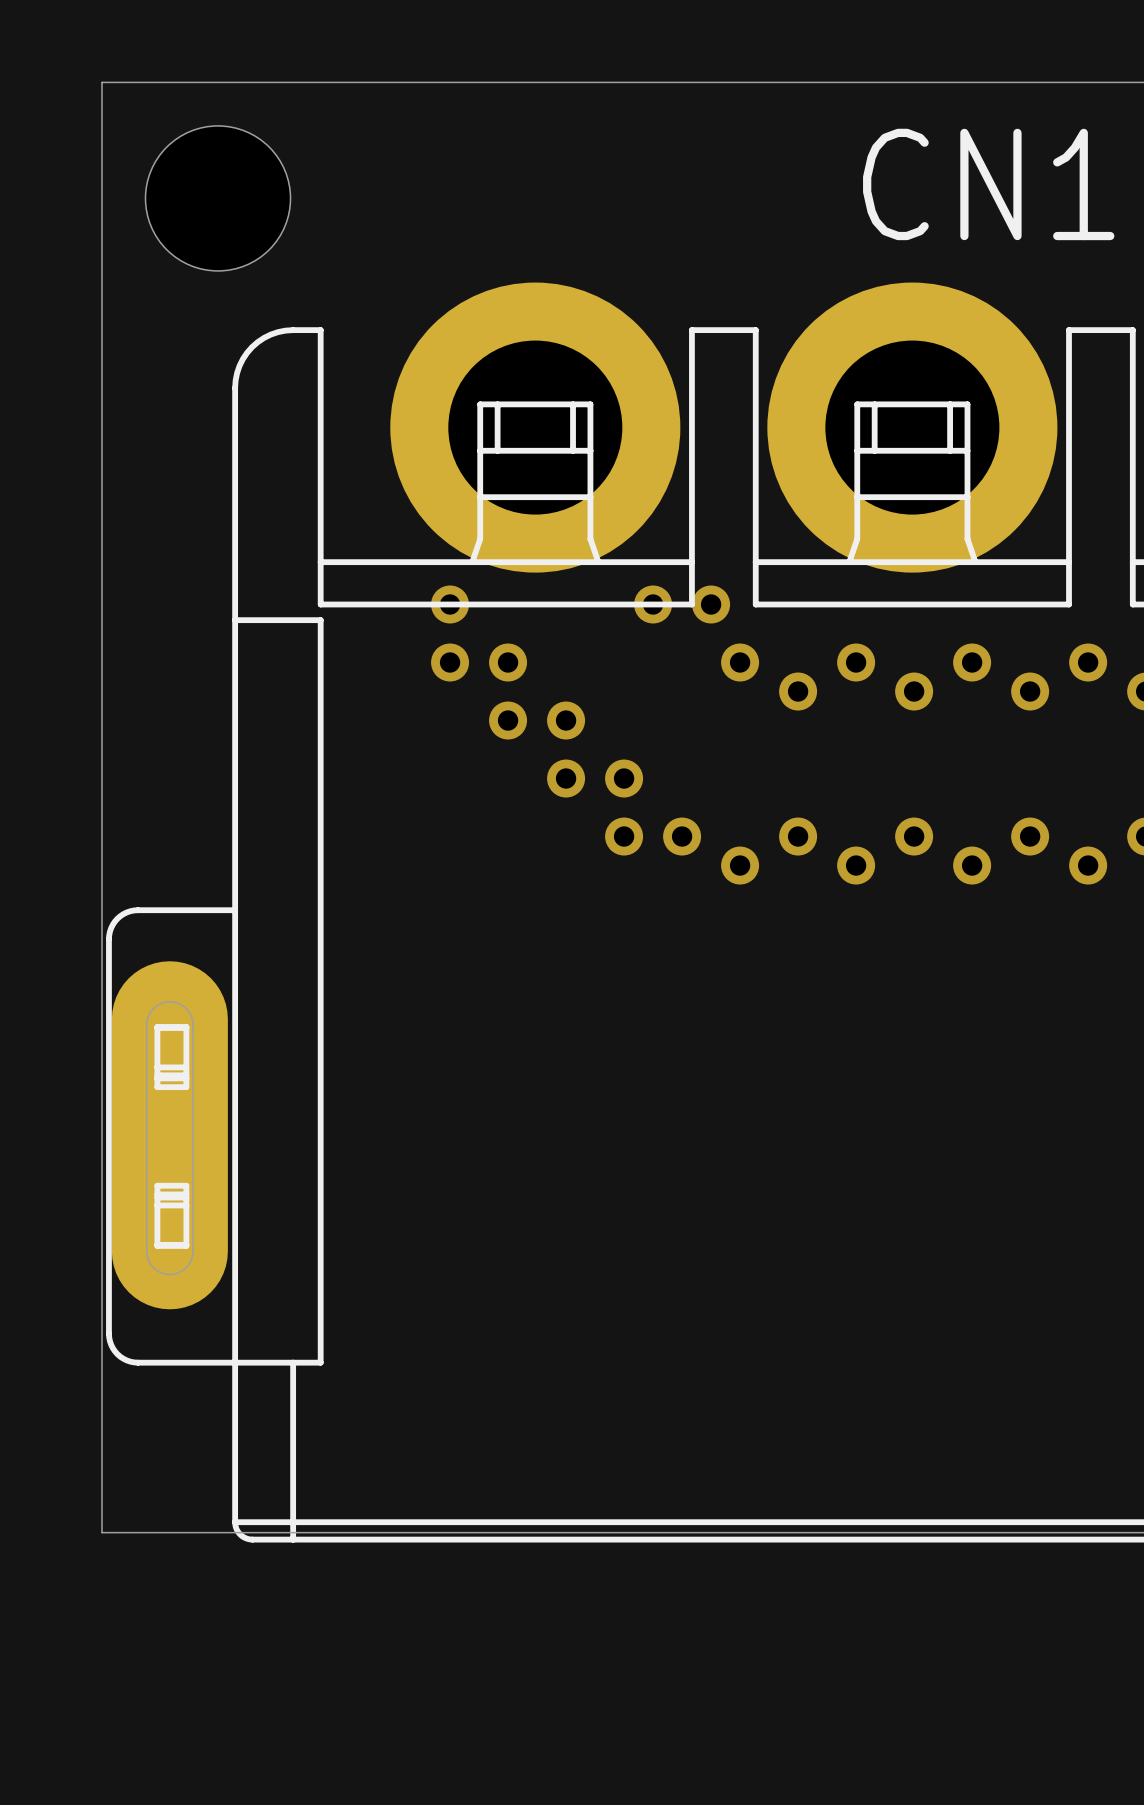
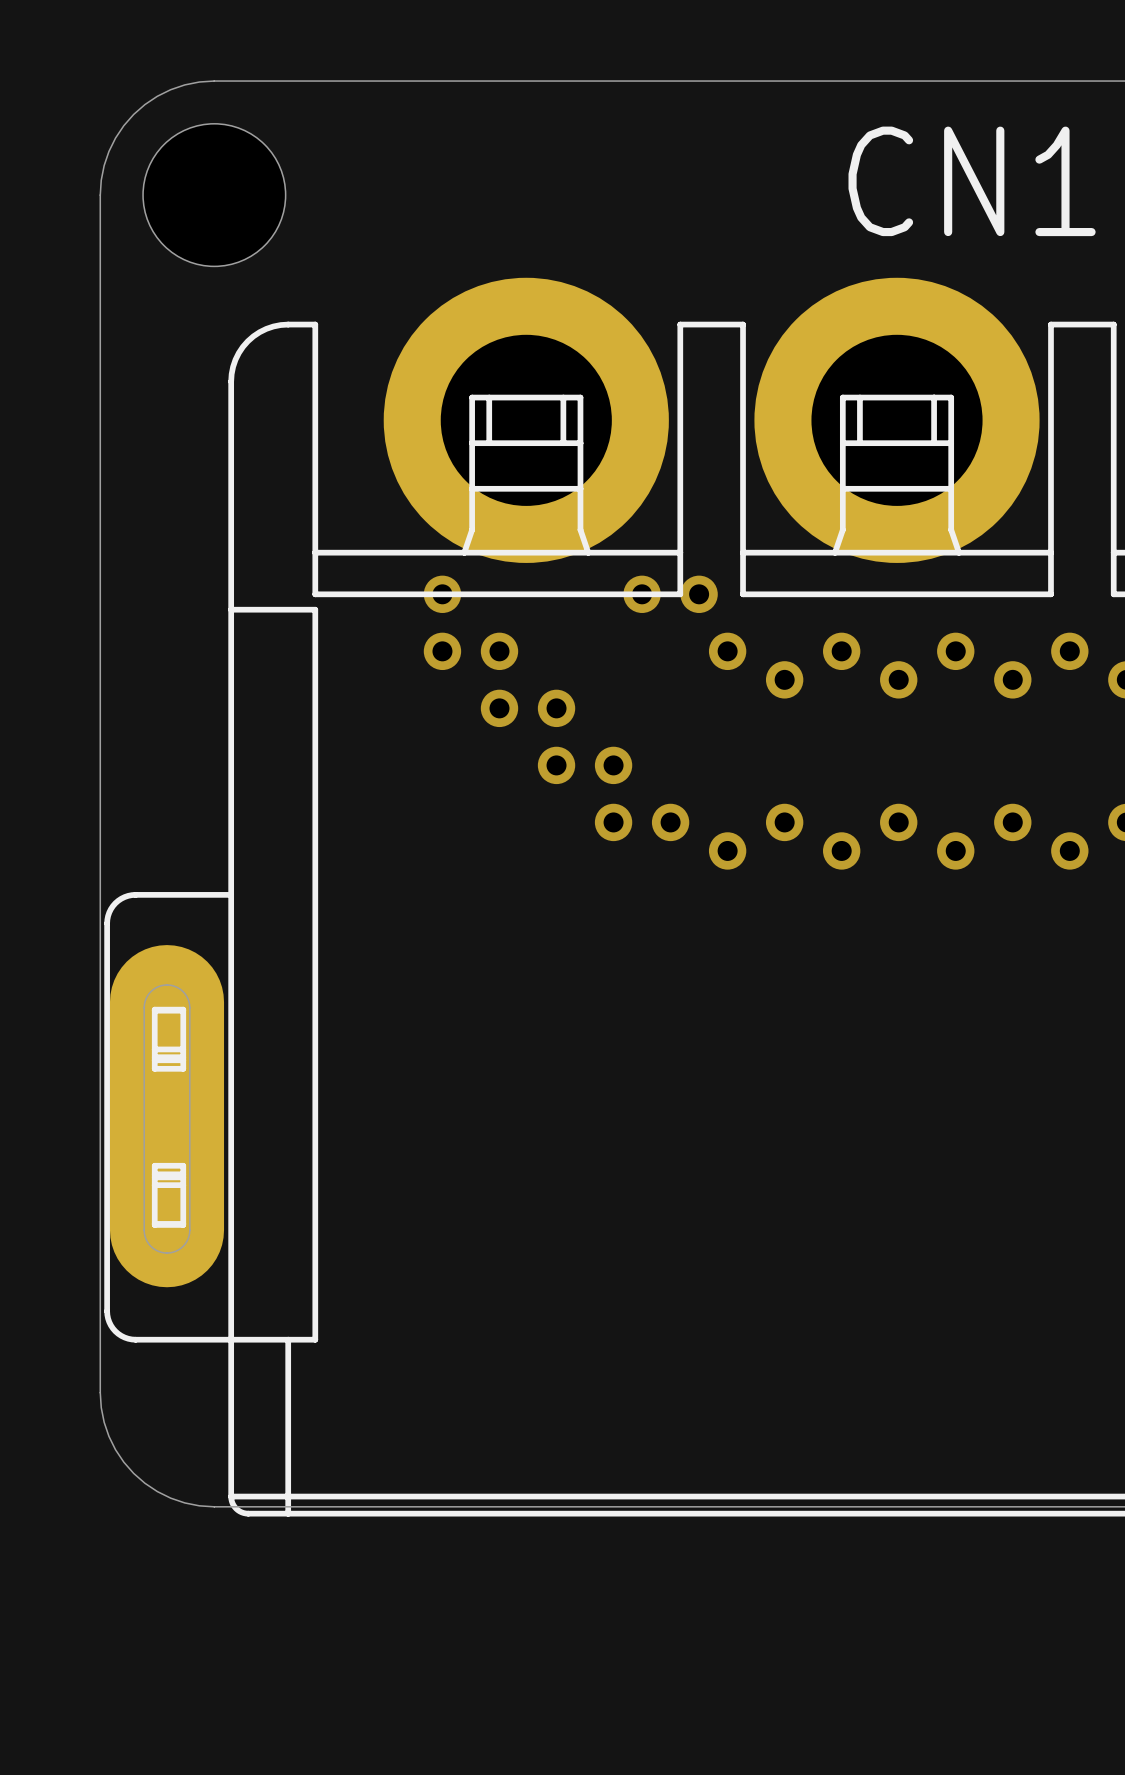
board edge: (218, 82) (101, 82) (101, 198) -> (214, 81) (184, 84) (170, 89) (157, 96) (133, 114) (115, 138) (108, 151) (104, 165) (100, 195)
board edge: (101, 1416) (101, 1532) (218, 1532) -> (100, 1392) (104, 1422) (108, 1436) (115, 1449) (133, 1473) (157, 1491) (170, 1498) (184, 1502) (214, 1506)

